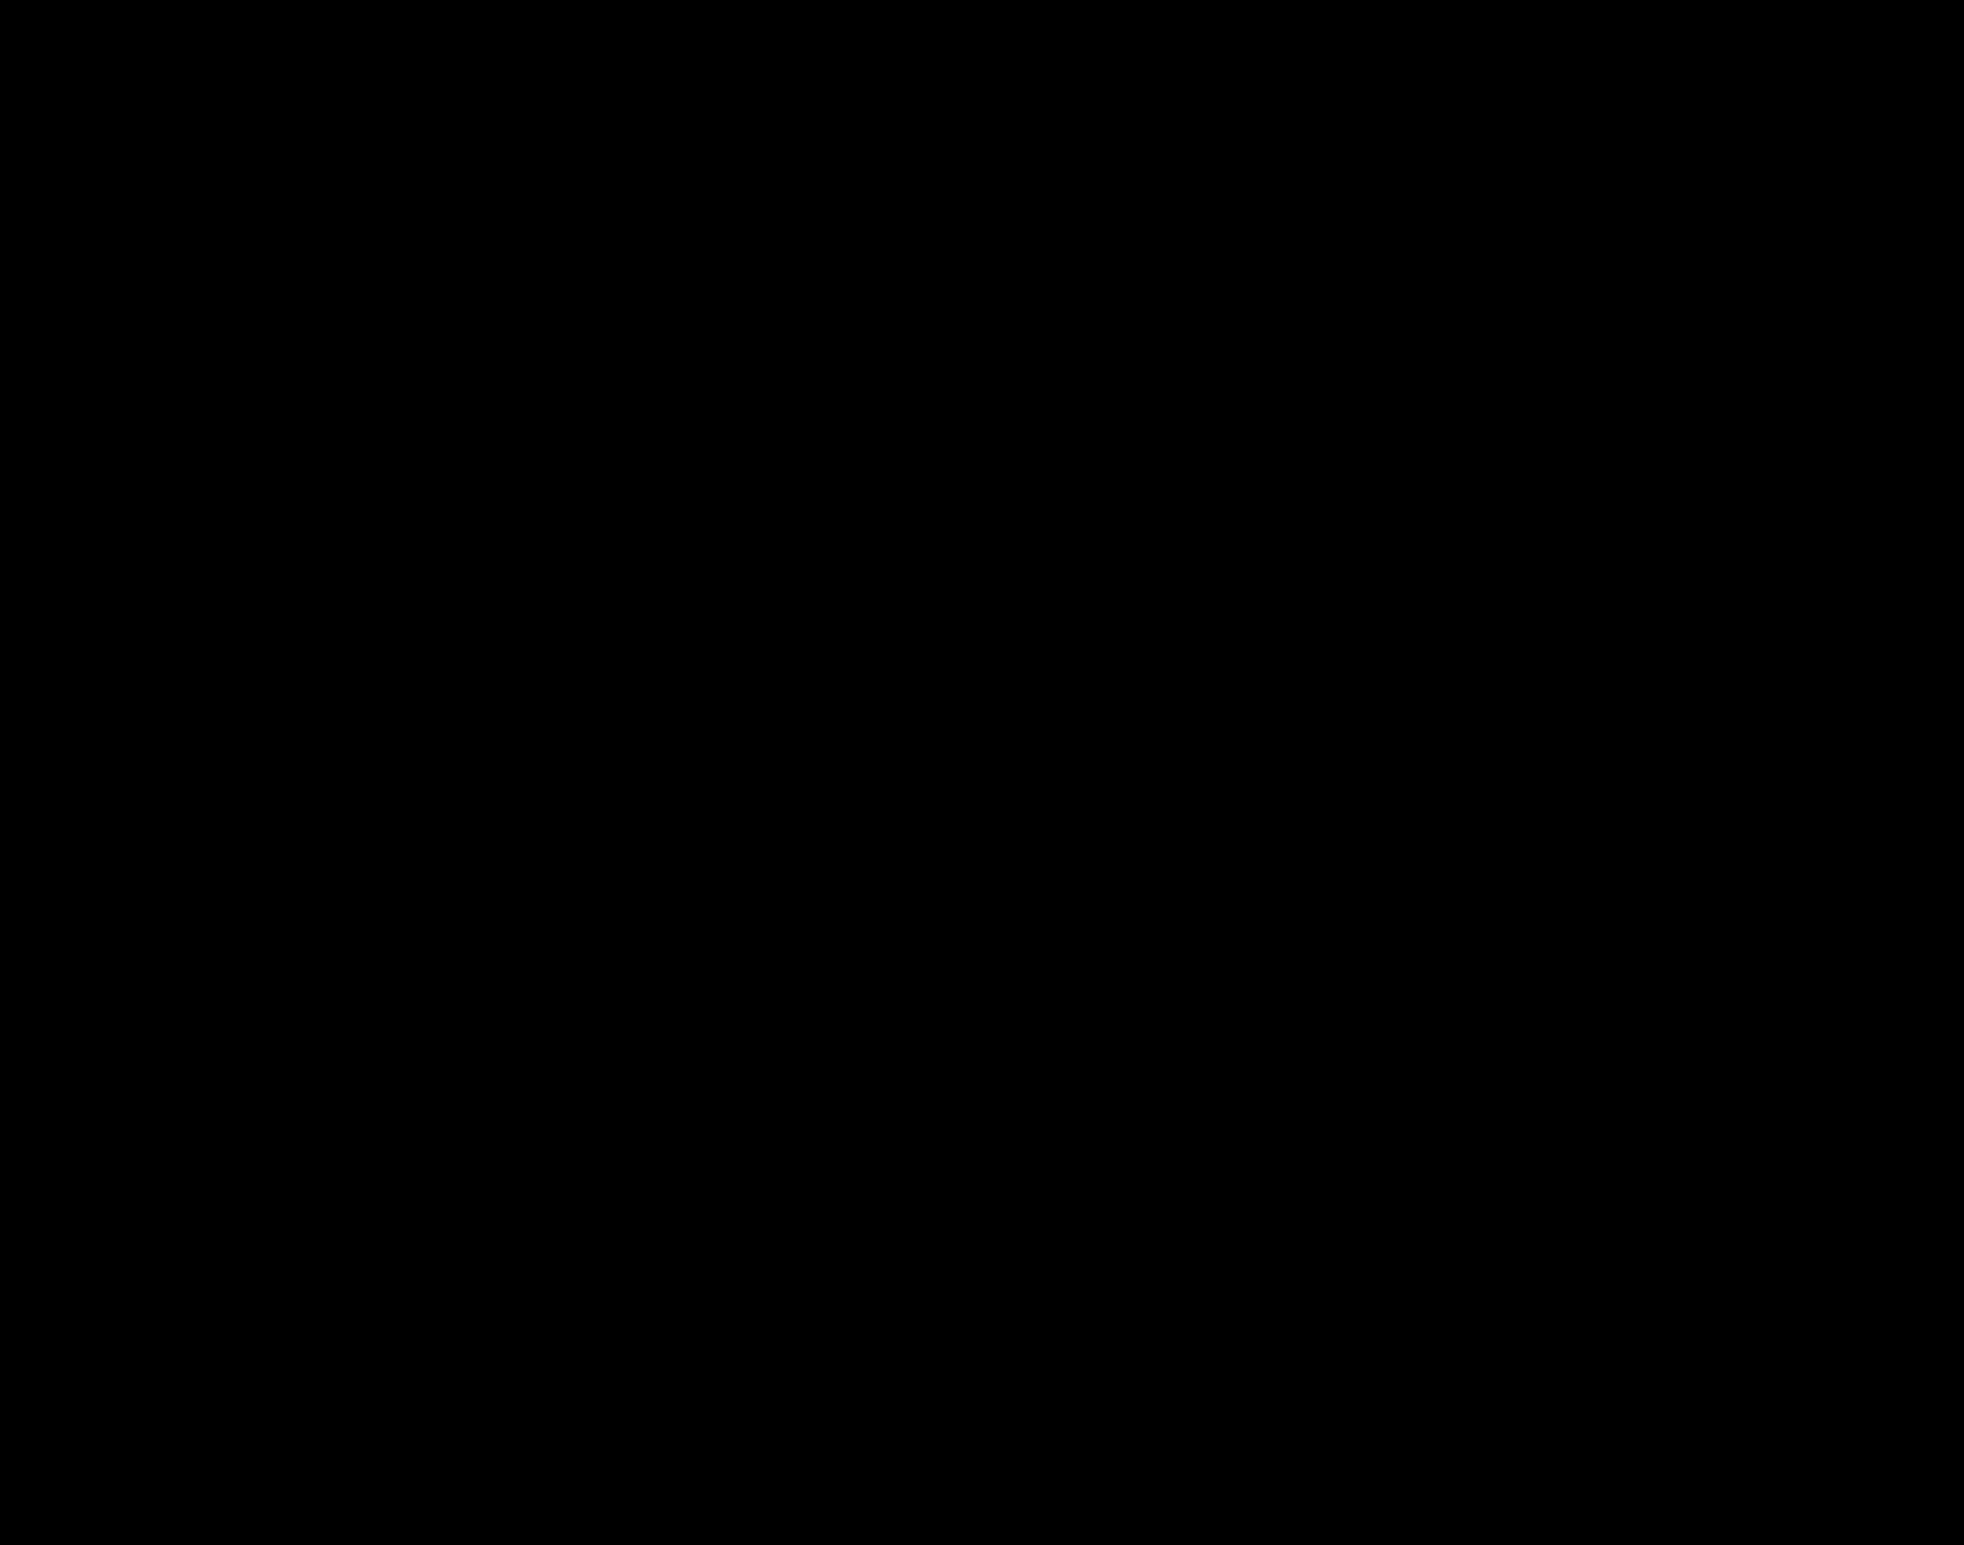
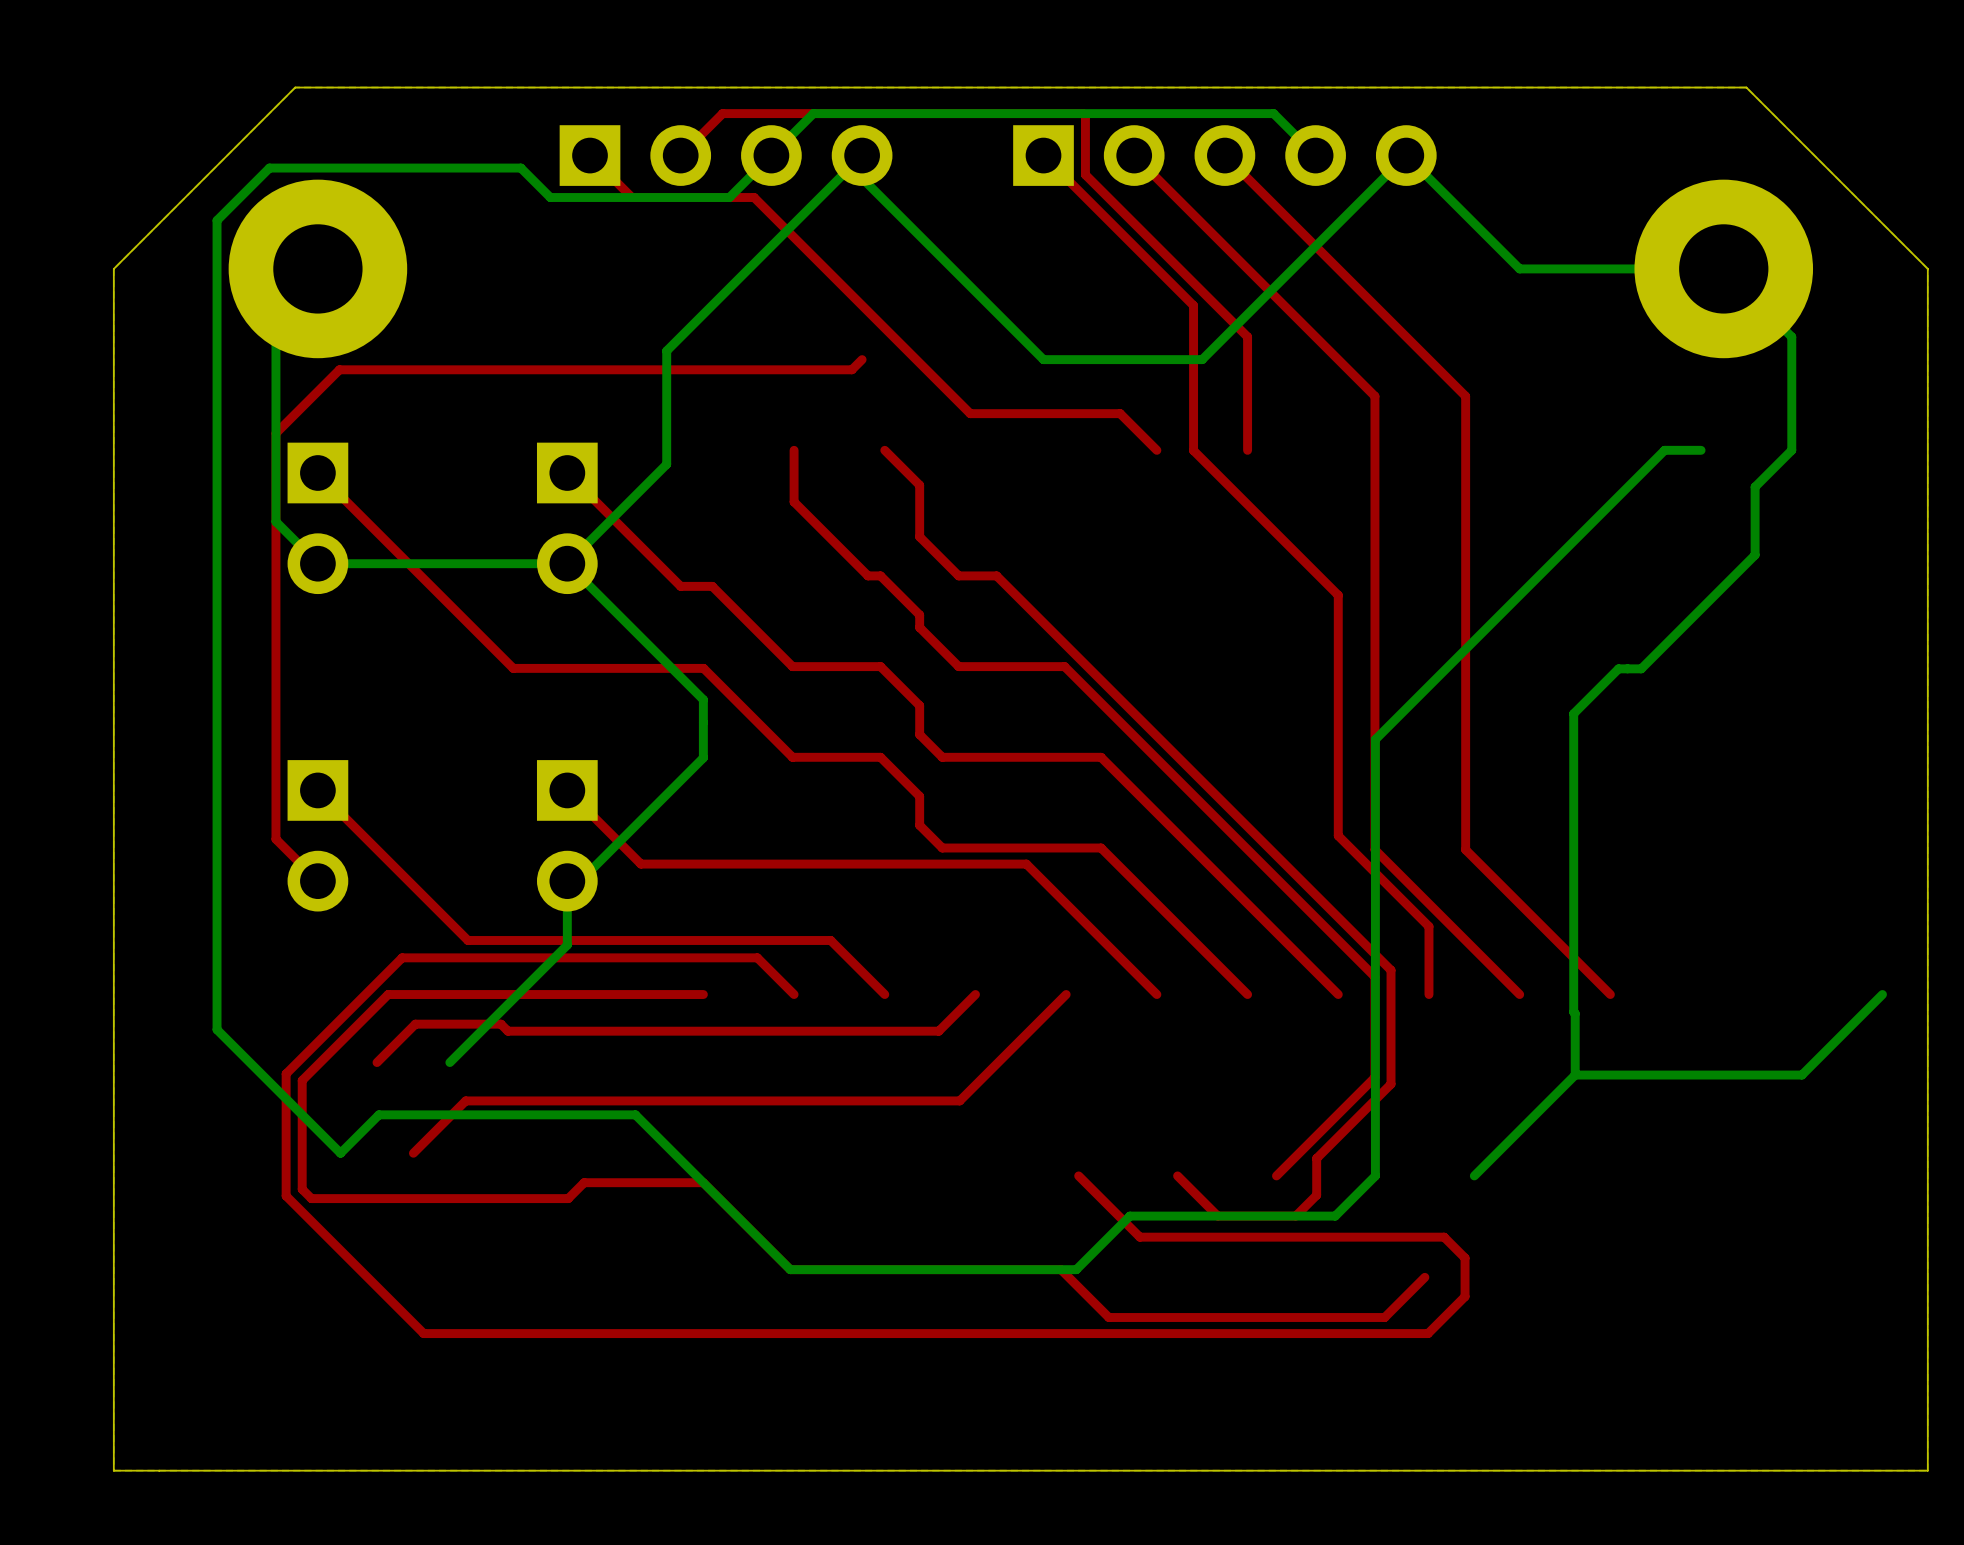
board edge: none -> (1746, 87) (295, 87) (113, 268) (113, 1470) (1927, 1470) (1927, 268) (1746, 87)
top track: none -> (590, 155) (631, 197) (754, 197) (970, 413) (1120, 413) (1156, 450)
top track: none -> (680, 155) (722, 113) (1083, 113) (1085, 115) (1085, 174) (1247, 336) (1247, 450)
part: none -> (726, 155)
top track: none -> (1043, 155) (1193, 305) (1193, 450) (1338, 595) (1338, 835) (1428, 926) (1428, 994)
top track: none -> (1134, 155) (1374, 396) (1374, 849) (1519, 994)
top track: none -> (1224, 155) (1465, 396) (1465, 849) (1610, 994)
part: none -> (1224, 155)
bottom track: none -> (1315, 155) (1273, 113) (813, 113) (729, 197) (550, 197) (520, 168) (269, 168) (217, 220) (217, 1029) (340, 1153) (378, 1114) (635, 1114) (790, 1269) (1076, 1269) (1129, 1216) (1335, 1216) (1375, 1175) (1375, 739) (1664, 450) (1701, 450)
bottom track: none -> (317, 268) (275, 310) (275, 521) (317, 563) (567, 563)
part: none -> (317, 268)
part: none -> (1723, 268)
top track: none -> (862, 359) (851, 369) (339, 369) (275, 433) (275, 839) (317, 881)
top track: none -> (794, 450) (794, 501) (868, 575) (880, 575) (919, 614) (919, 627) (958, 666) (1064, 666) (1374, 976) (1374, 1077) (1276, 1175)
top track: none -> (884, 450) (919, 485) (919, 536) (958, 575) (996, 575) (1391, 970) (1391, 1084) (1316, 1158) (1316, 1195) (1295, 1216) (1217, 1216) (1177, 1175)
top track: none -> (317, 473) (513, 668) (703, 668) (792, 757) (880, 757) (919, 796) (919, 825) (942, 848) (1101, 848) (1247, 994)
top track: none -> (567, 473) (680, 586) (712, 586) (792, 666) (880, 666) (919, 705) (919, 734) (942, 757) (1101, 757) (1338, 994)
part: none -> (317, 518)
part: none -> (567, 518)
bottom track: none -> (567, 563) (666, 464) (666, 350) (862, 155) (862, 178) (1043, 359) (1202, 359) (1406, 155) (1519, 268) (1723, 268) (1791, 336) (1791, 450) (1755, 486) (1755, 555) (1641, 668) (1618, 668) (1573, 713) (1575, 1075)
bottom track: none -> (567, 563) (703, 699) (703, 757) (580, 881) (567, 881) (567, 945) (449, 1062)
top track: none -> (317, 790) (467, 940) (830, 940) (884, 994)
top track: none -> (567, 790) (640, 864) (1026, 864) (1156, 994)
part: none -> (317, 835)
part: none -> (567, 835)
top track: none -> (703, 994) (388, 994) (302, 1080) (302, 1189) (311, 1198) (568, 1198) (584, 1182) (703, 1182) (790, 1269) (1061, 1269) (1108, 1317) (1384, 1317) (1424, 1277)
top track: none -> (794, 994) (757, 957) (402, 957) (286, 1073) (286, 1195) (423, 1333) (1428, 1333) (1465, 1296) (1465, 1258) (1444, 1237) (1139, 1237) (1078, 1175)
top track: none -> (975, 994) (938, 1031) (507, 1031) (500, 1024) (415, 1024) (377, 1062)
top track: none -> (1066, 994) (959, 1100) (465, 1100) (413, 1153)
bottom track: none -> (1882, 994) (1801, 1075) (1575, 1075)
bottom track: none -> (1575, 1075) (1474, 1175)

